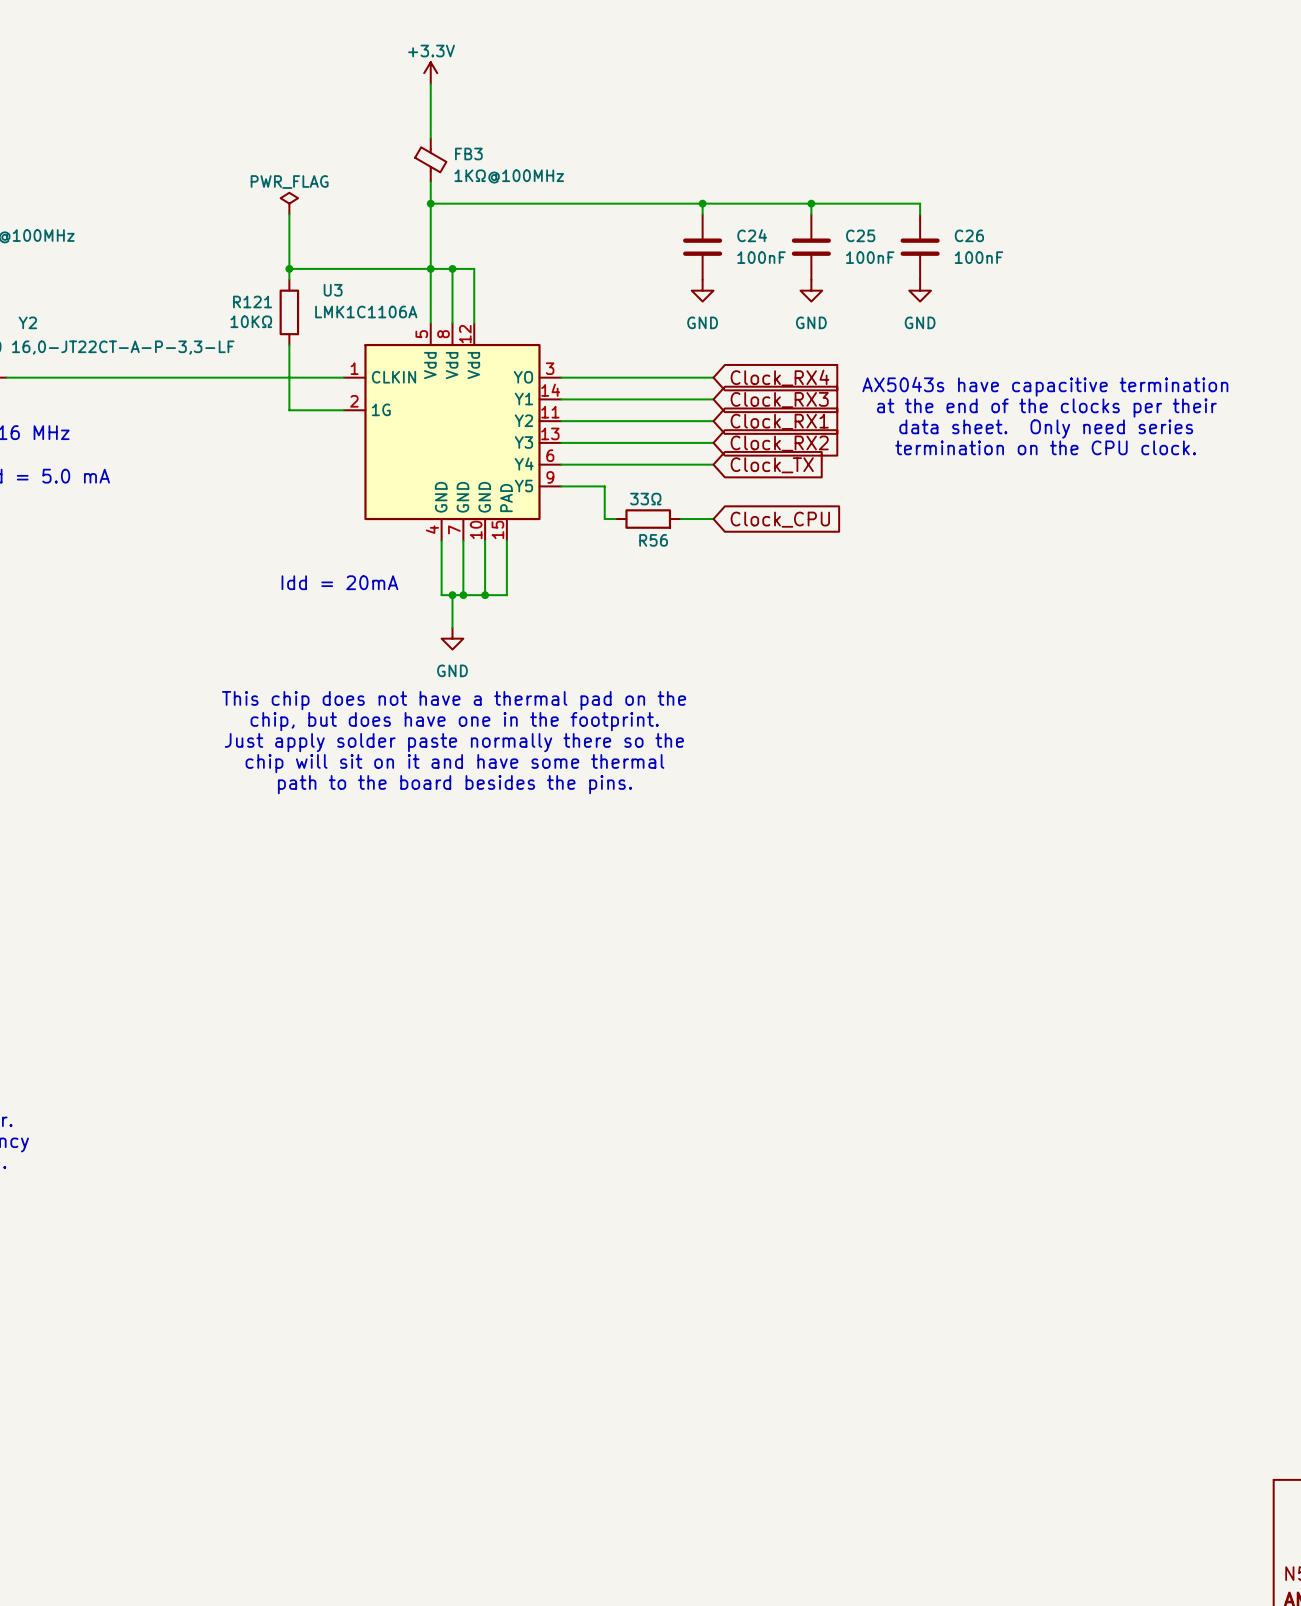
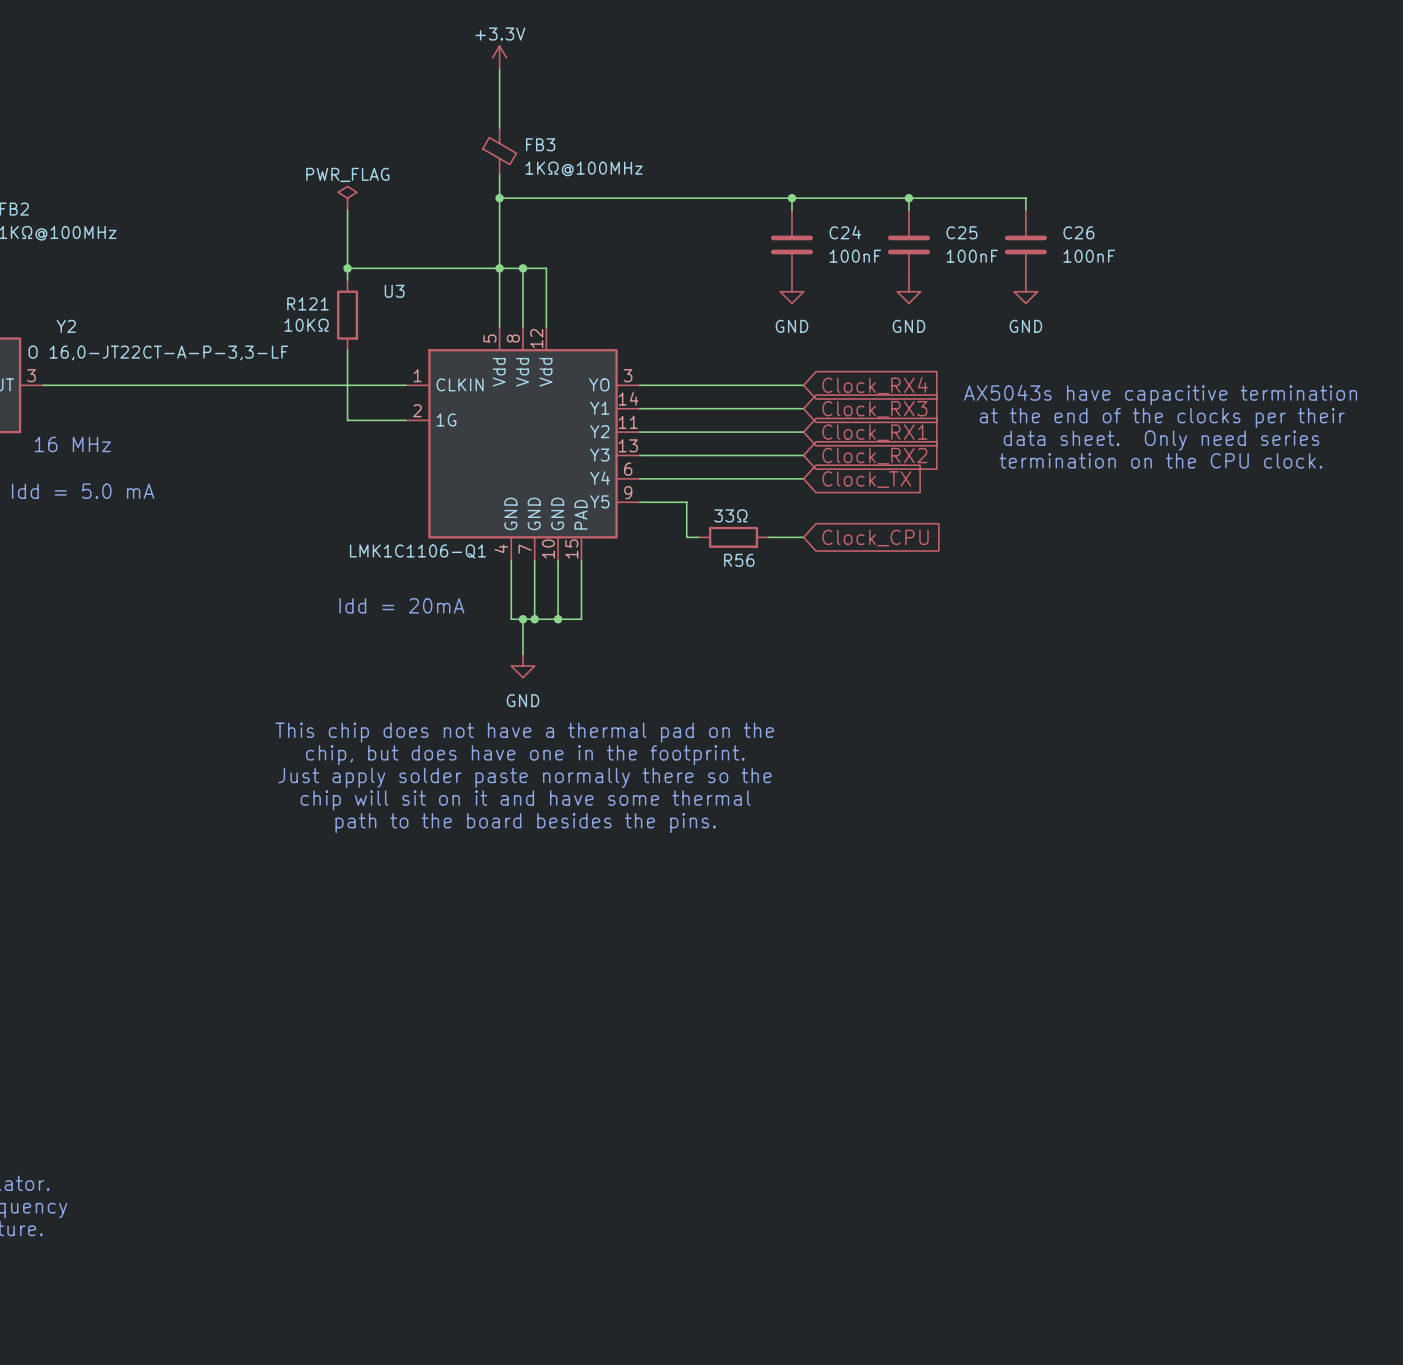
U3 value: LMK1C1106A (366, 312) -> LMK1C1106-Q1 (418, 551)

